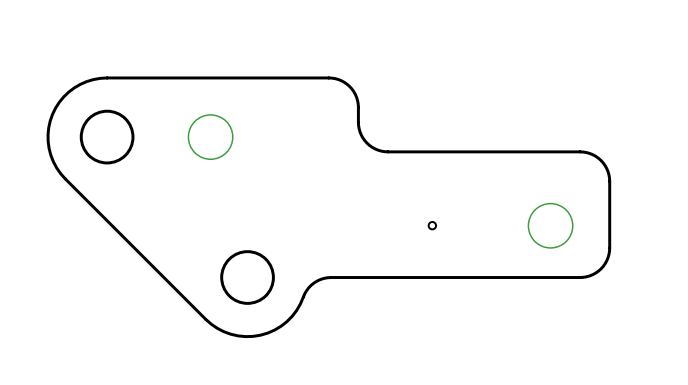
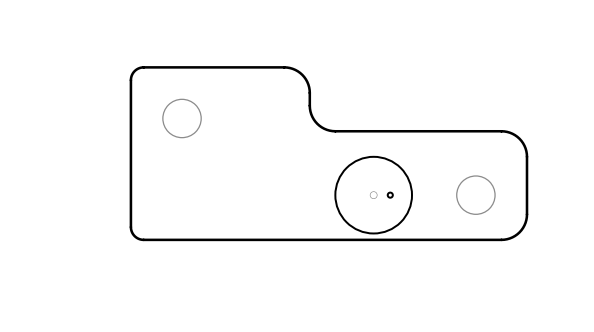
board edge: (166, 77) (100, 78) (86, 81) (68, 92) (55, 108) (48, 127) (48, 141) (50, 155) (60, 173) (205, 319) (224, 331) (245, 336) (260, 335) (274, 330) (292, 316) (311, 285) (320, 279) (331, 277) -> (143, 67) (134, 71) (131, 78) (130, 227) (133, 235) (143, 239) (286, 239)
round board edge: [79, 109, 135, 165] -> none
part footprint: [428, 221, 437, 230] -> [334, 156, 413, 235]
round board edge: [220, 250, 275, 305] -> none

